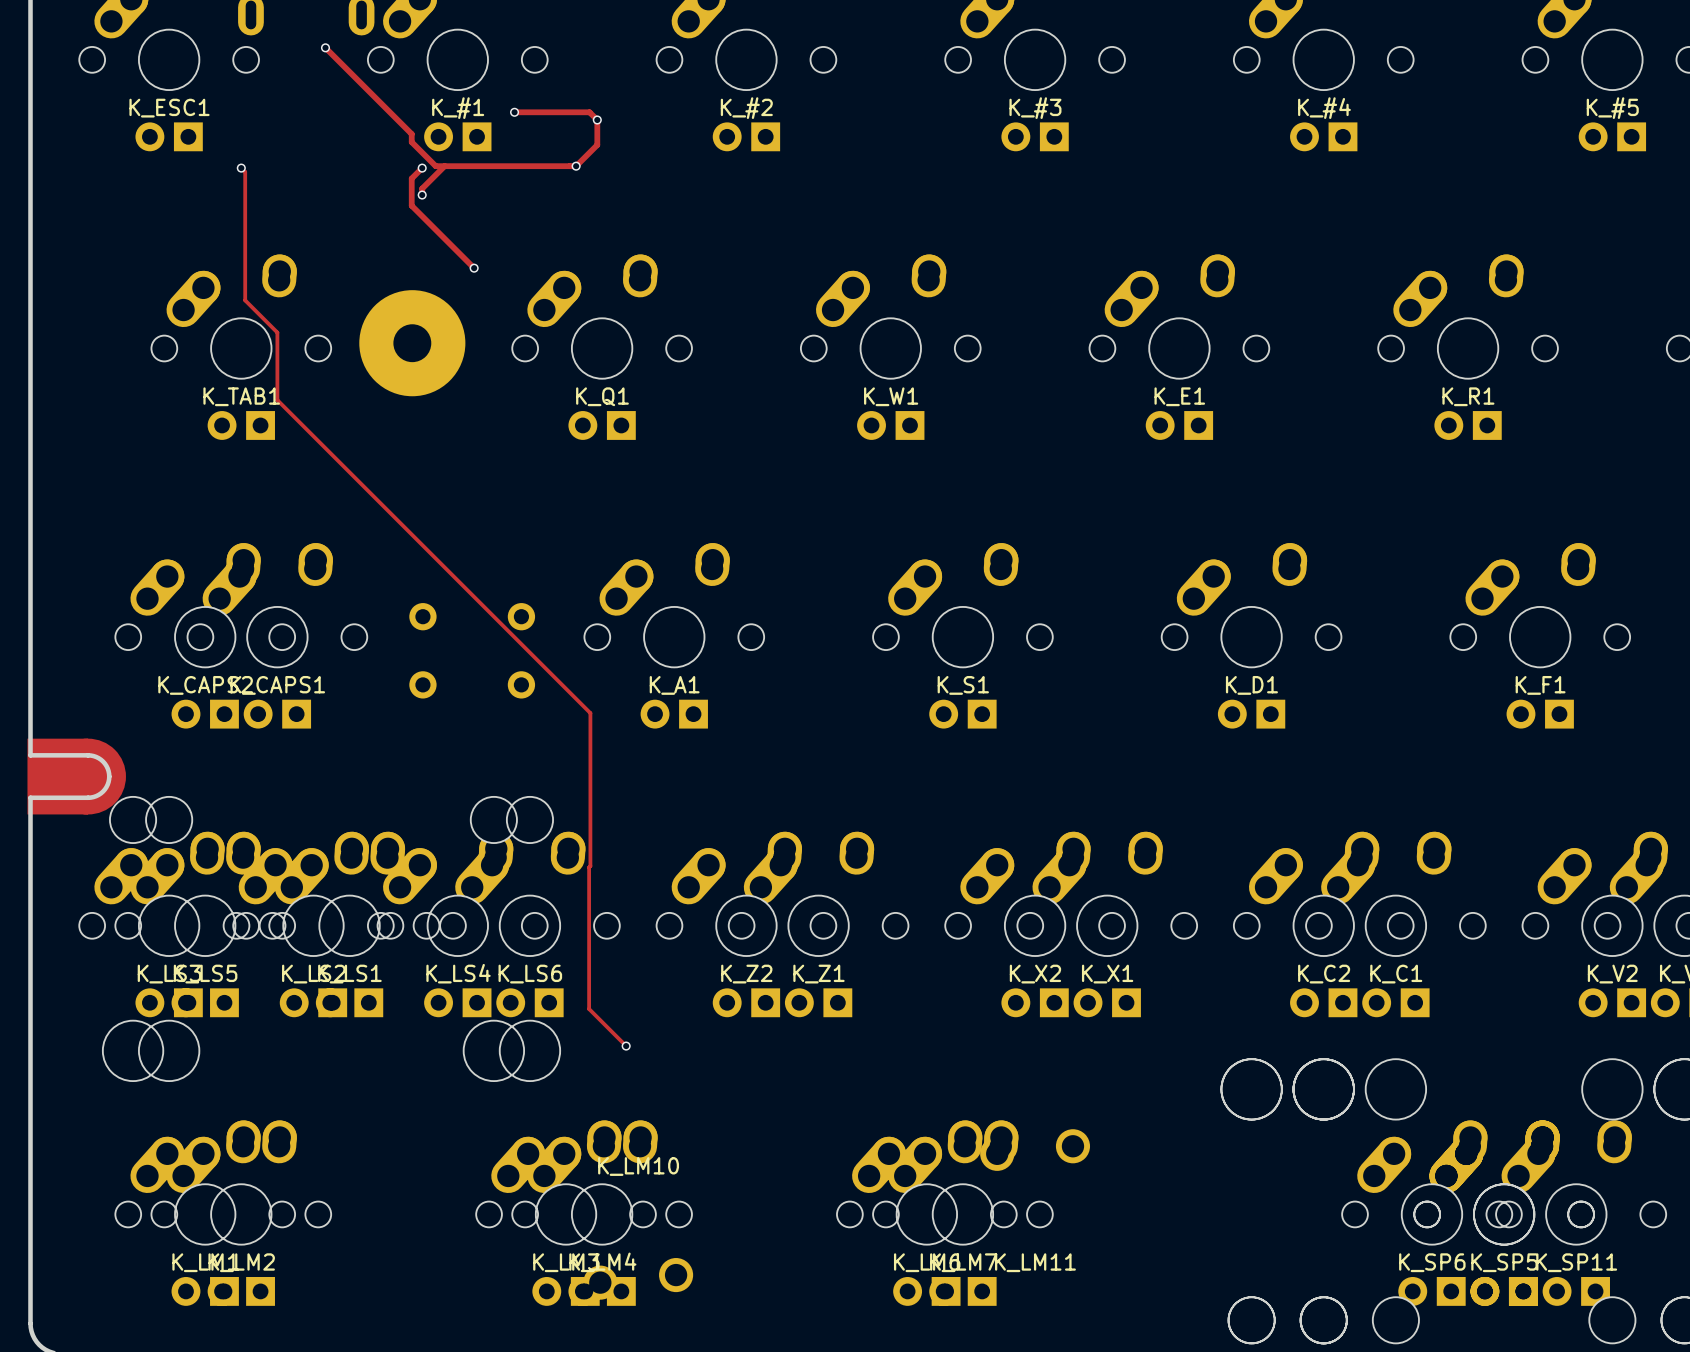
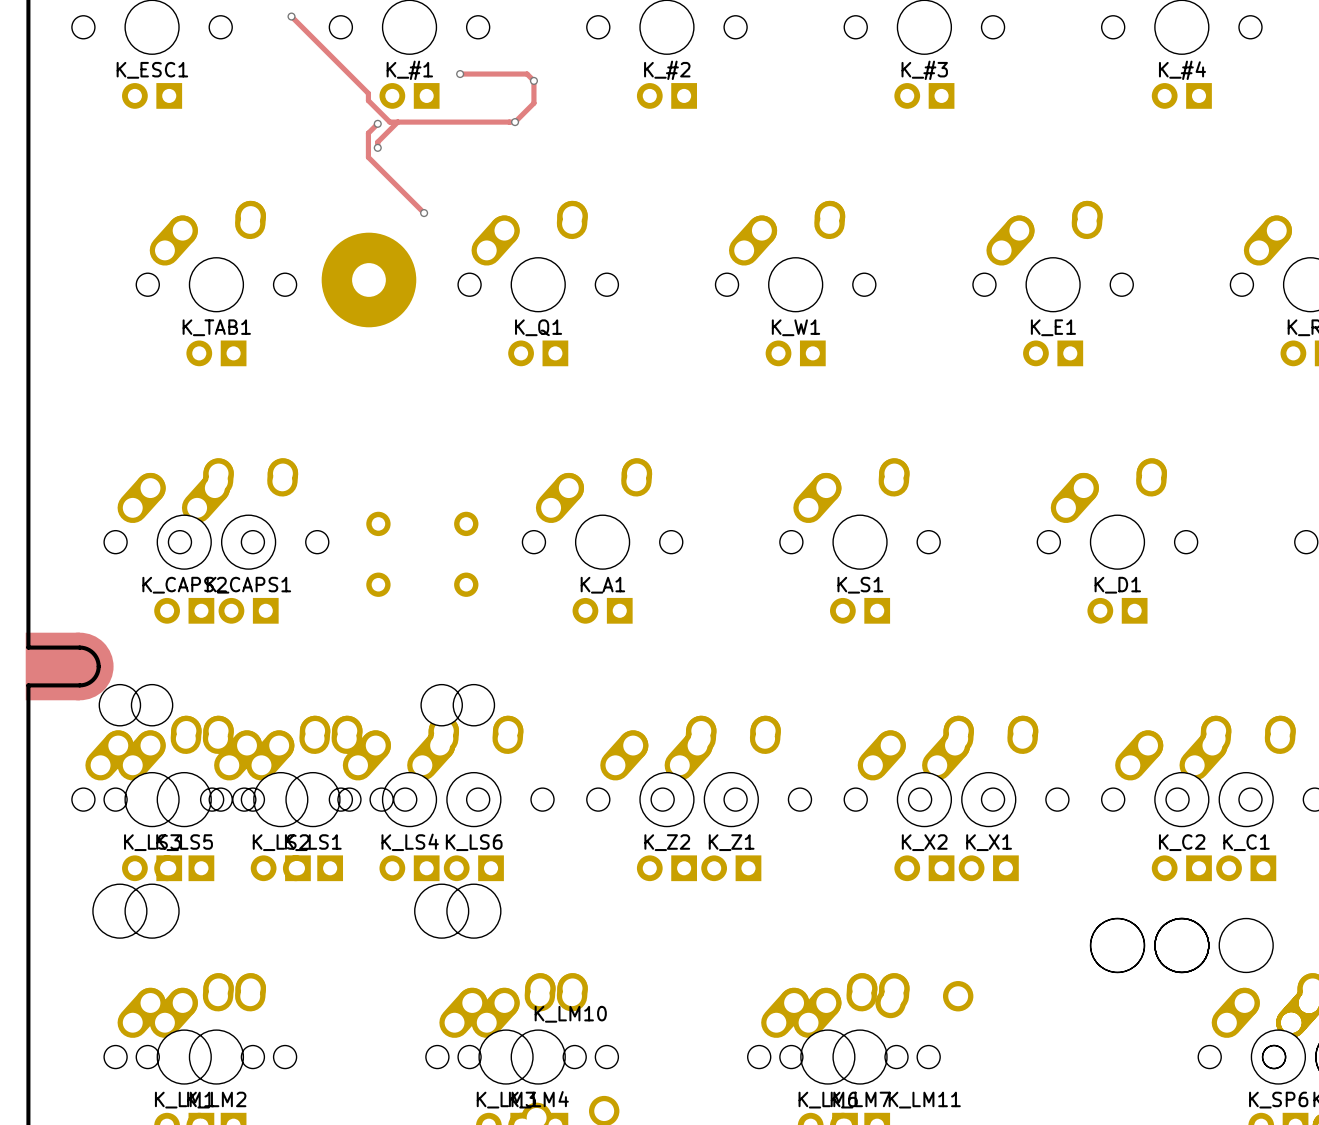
track: (241, 168) (245, 171) (245, 300) (277, 332) (277, 400) (590, 713) (589, 1009) (626, 1046) -> none
via: (241, 168) -> none
via: (626, 1046) -> none

